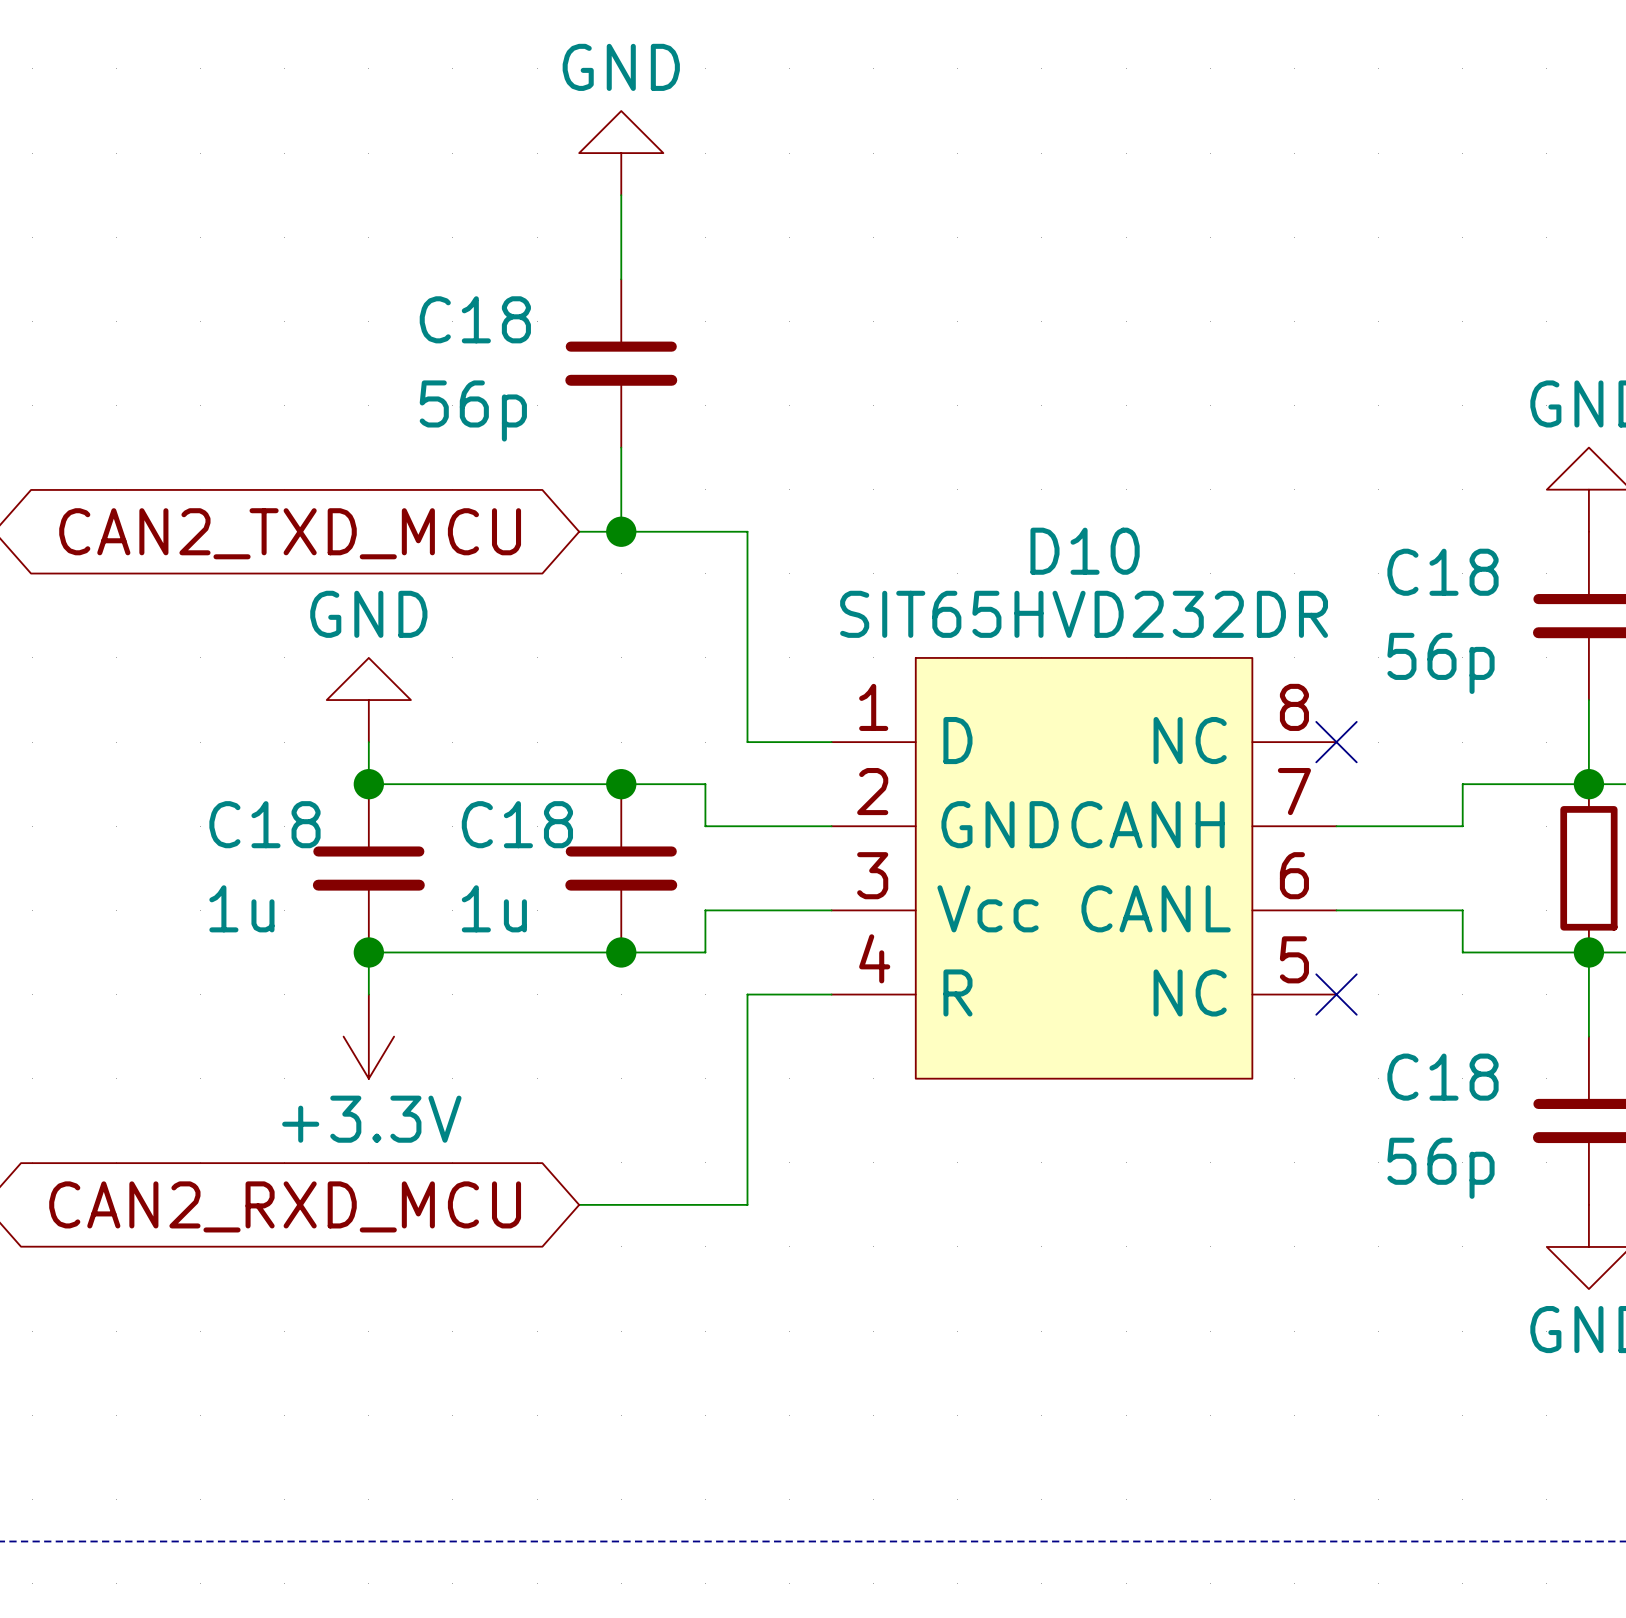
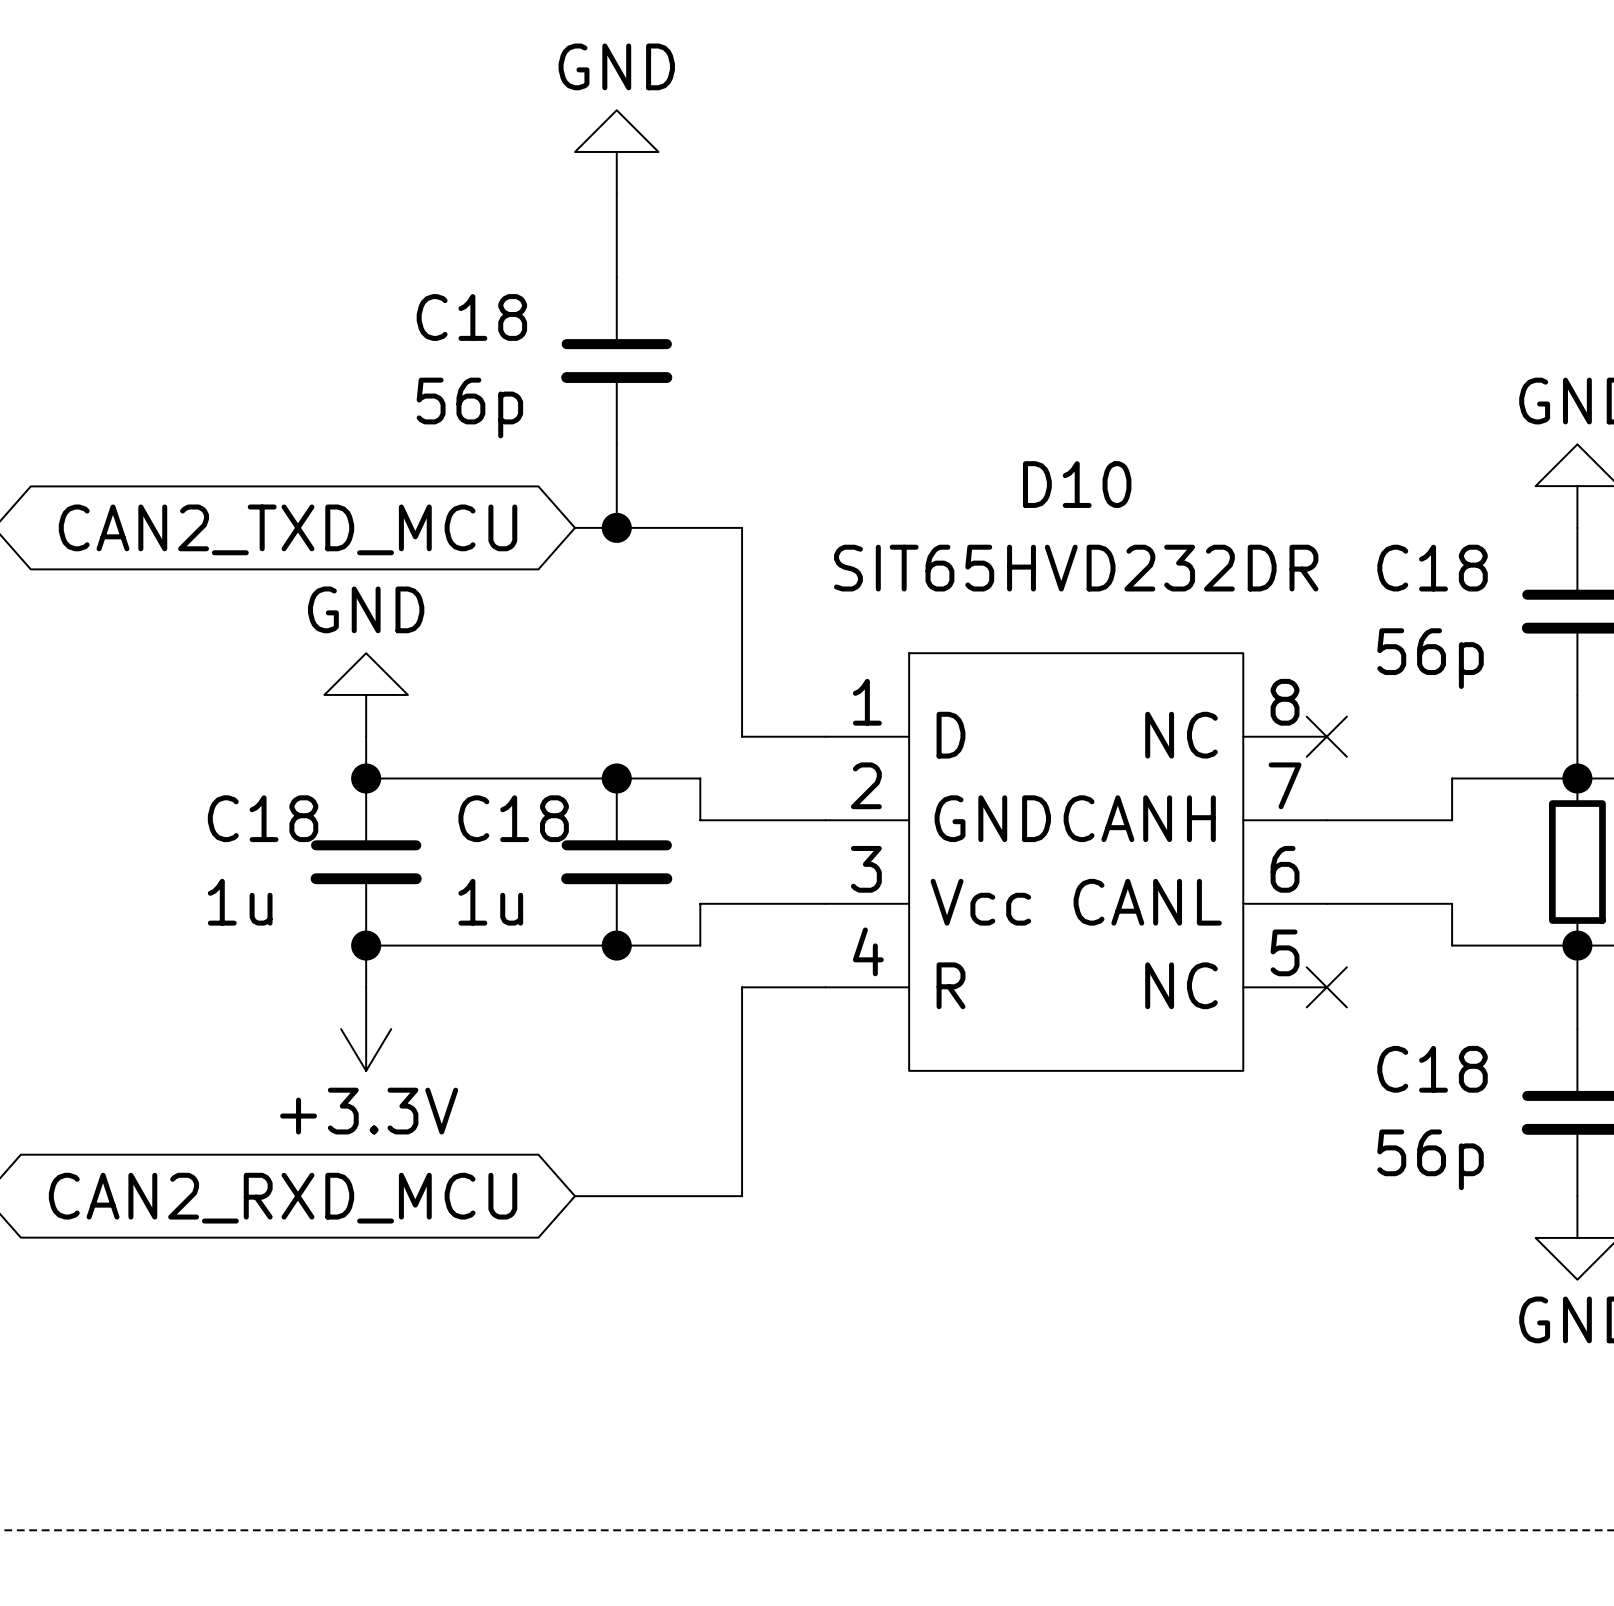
D10 name position: D10 (1085, 551) -> D10 (1077, 484)
D10 value position: SIT65HVD232DR (1084, 614) -> SIT65HVD232DR (1076, 568)

